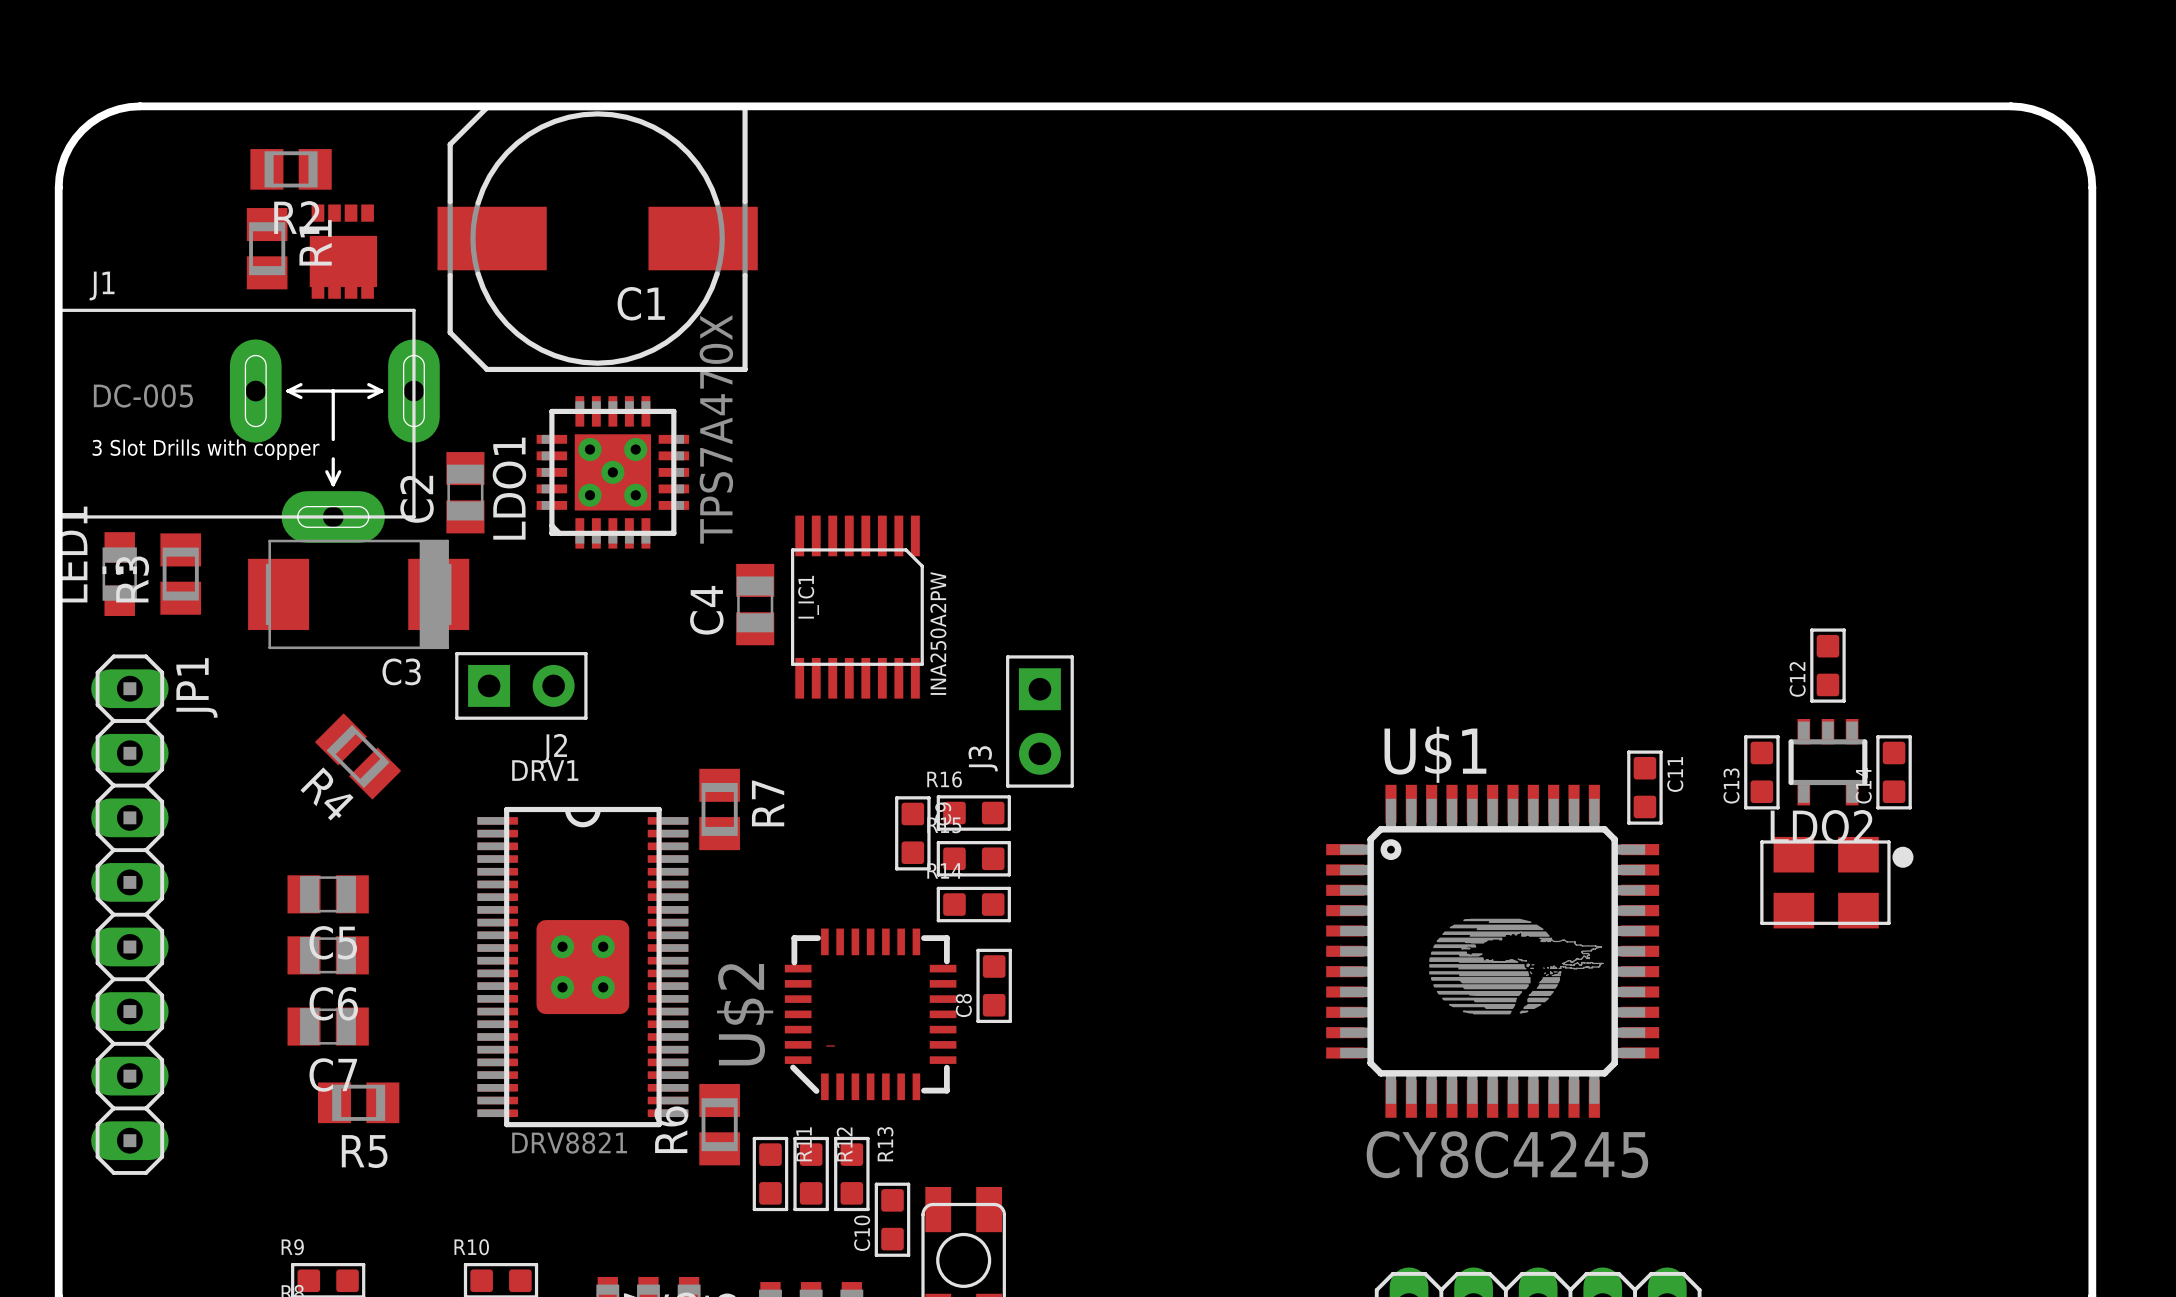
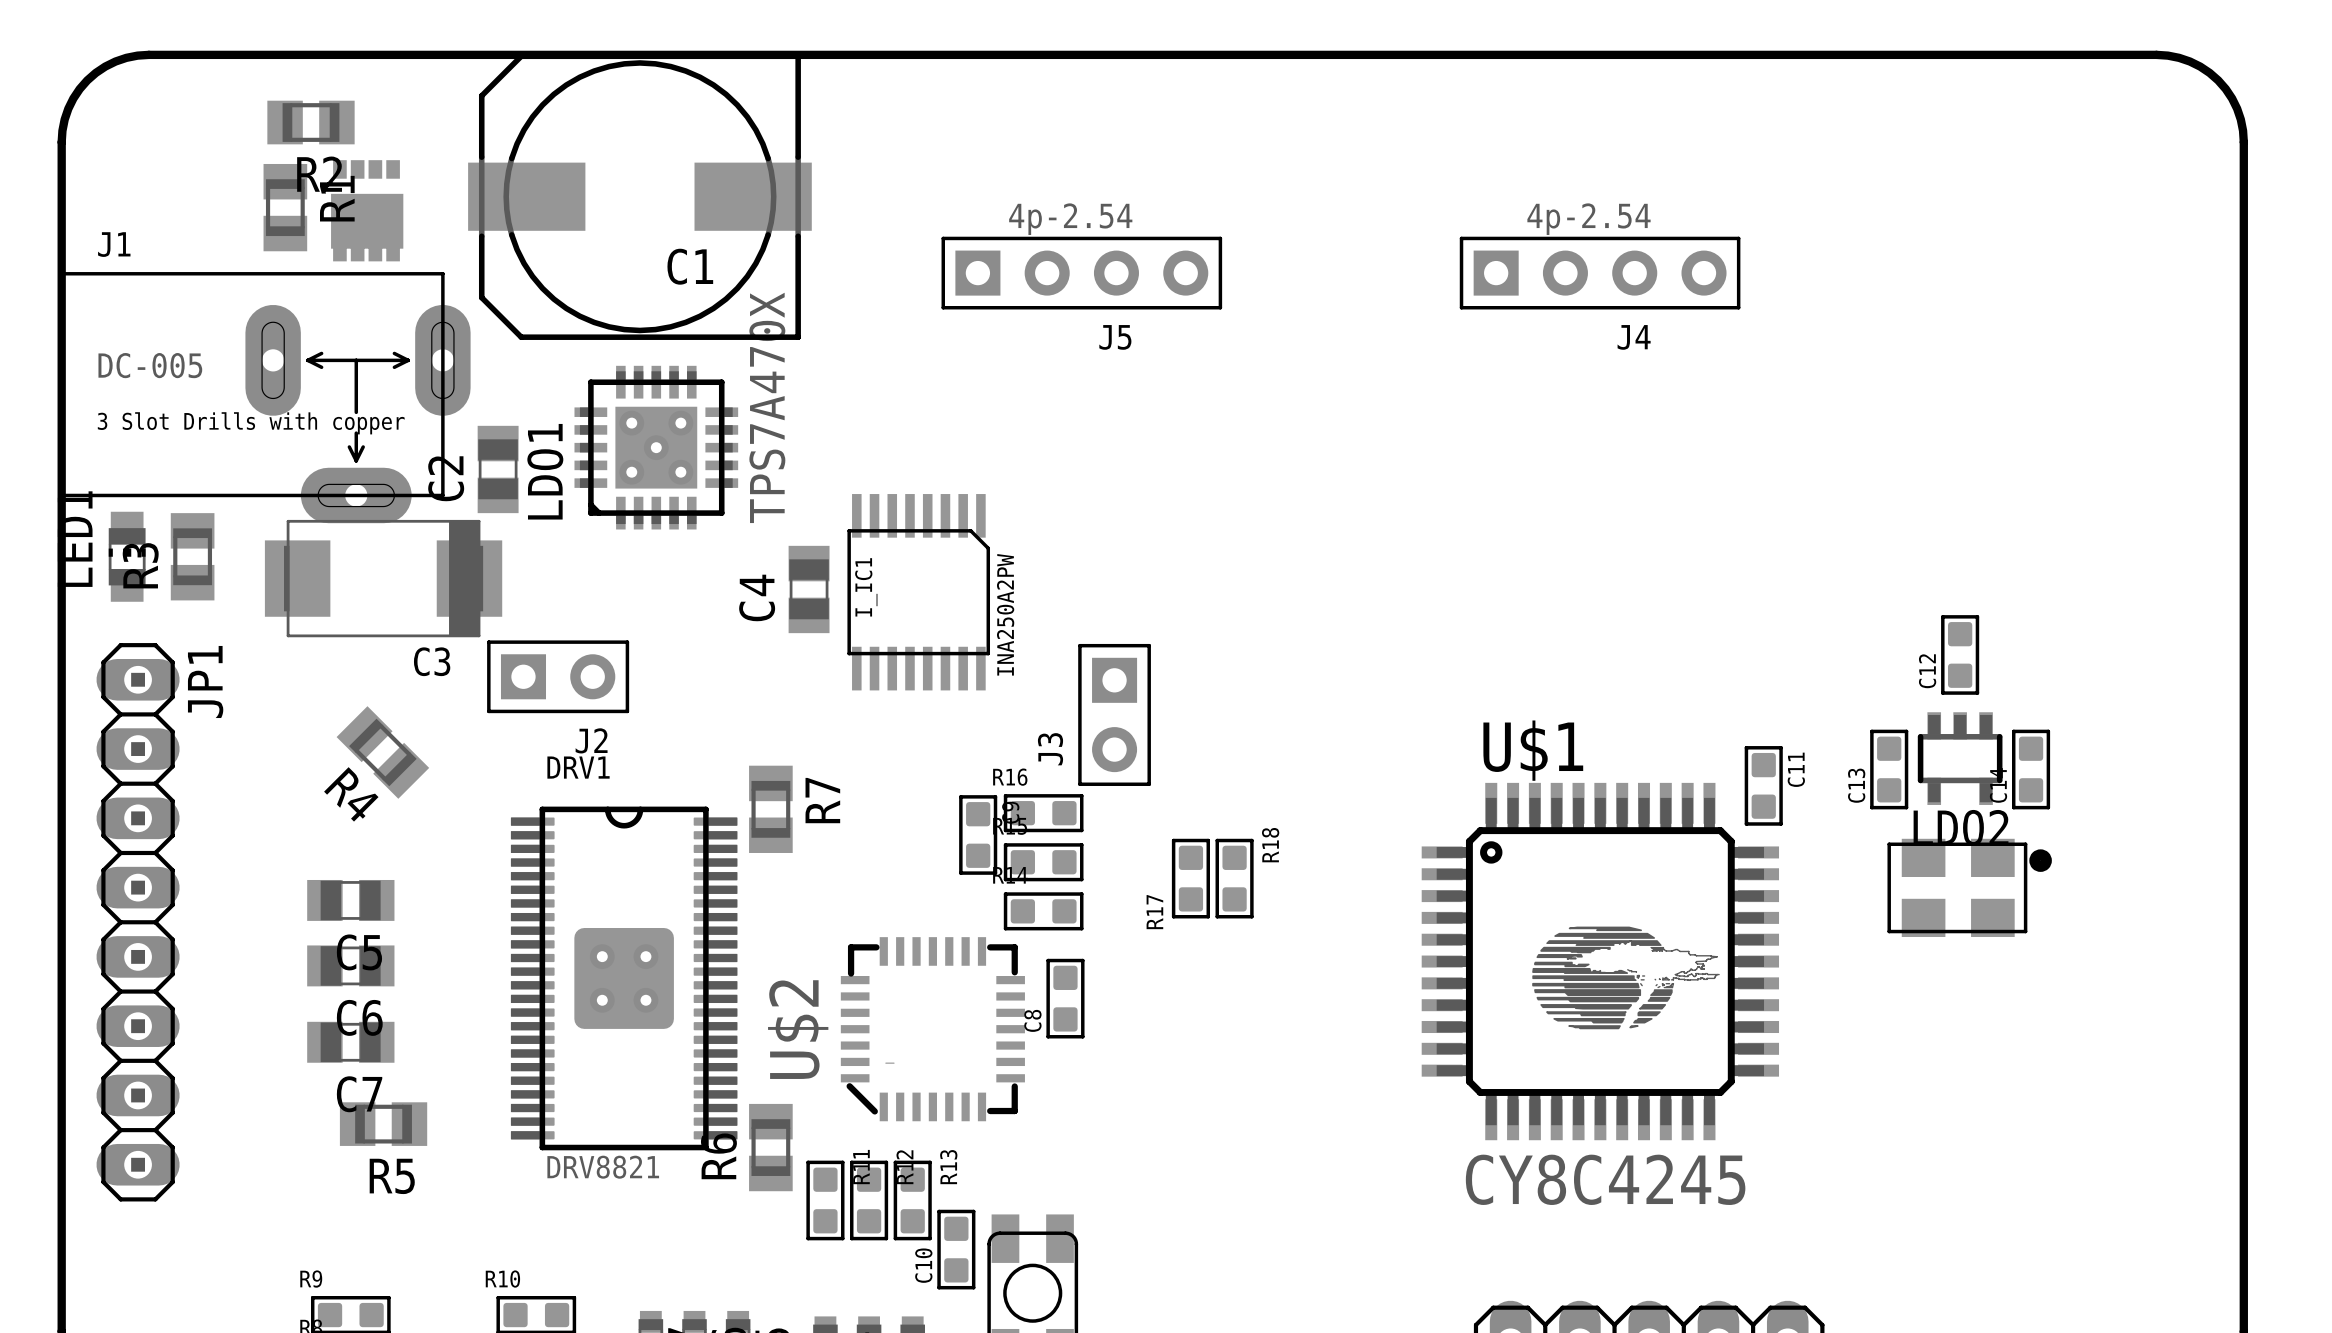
J5: none -> 4p-2.54 (1081, 273)
J4: none -> 4p-2.54 (1600, 273)
R17: none -> (1190, 878)
R18: none -> (1234, 878)

